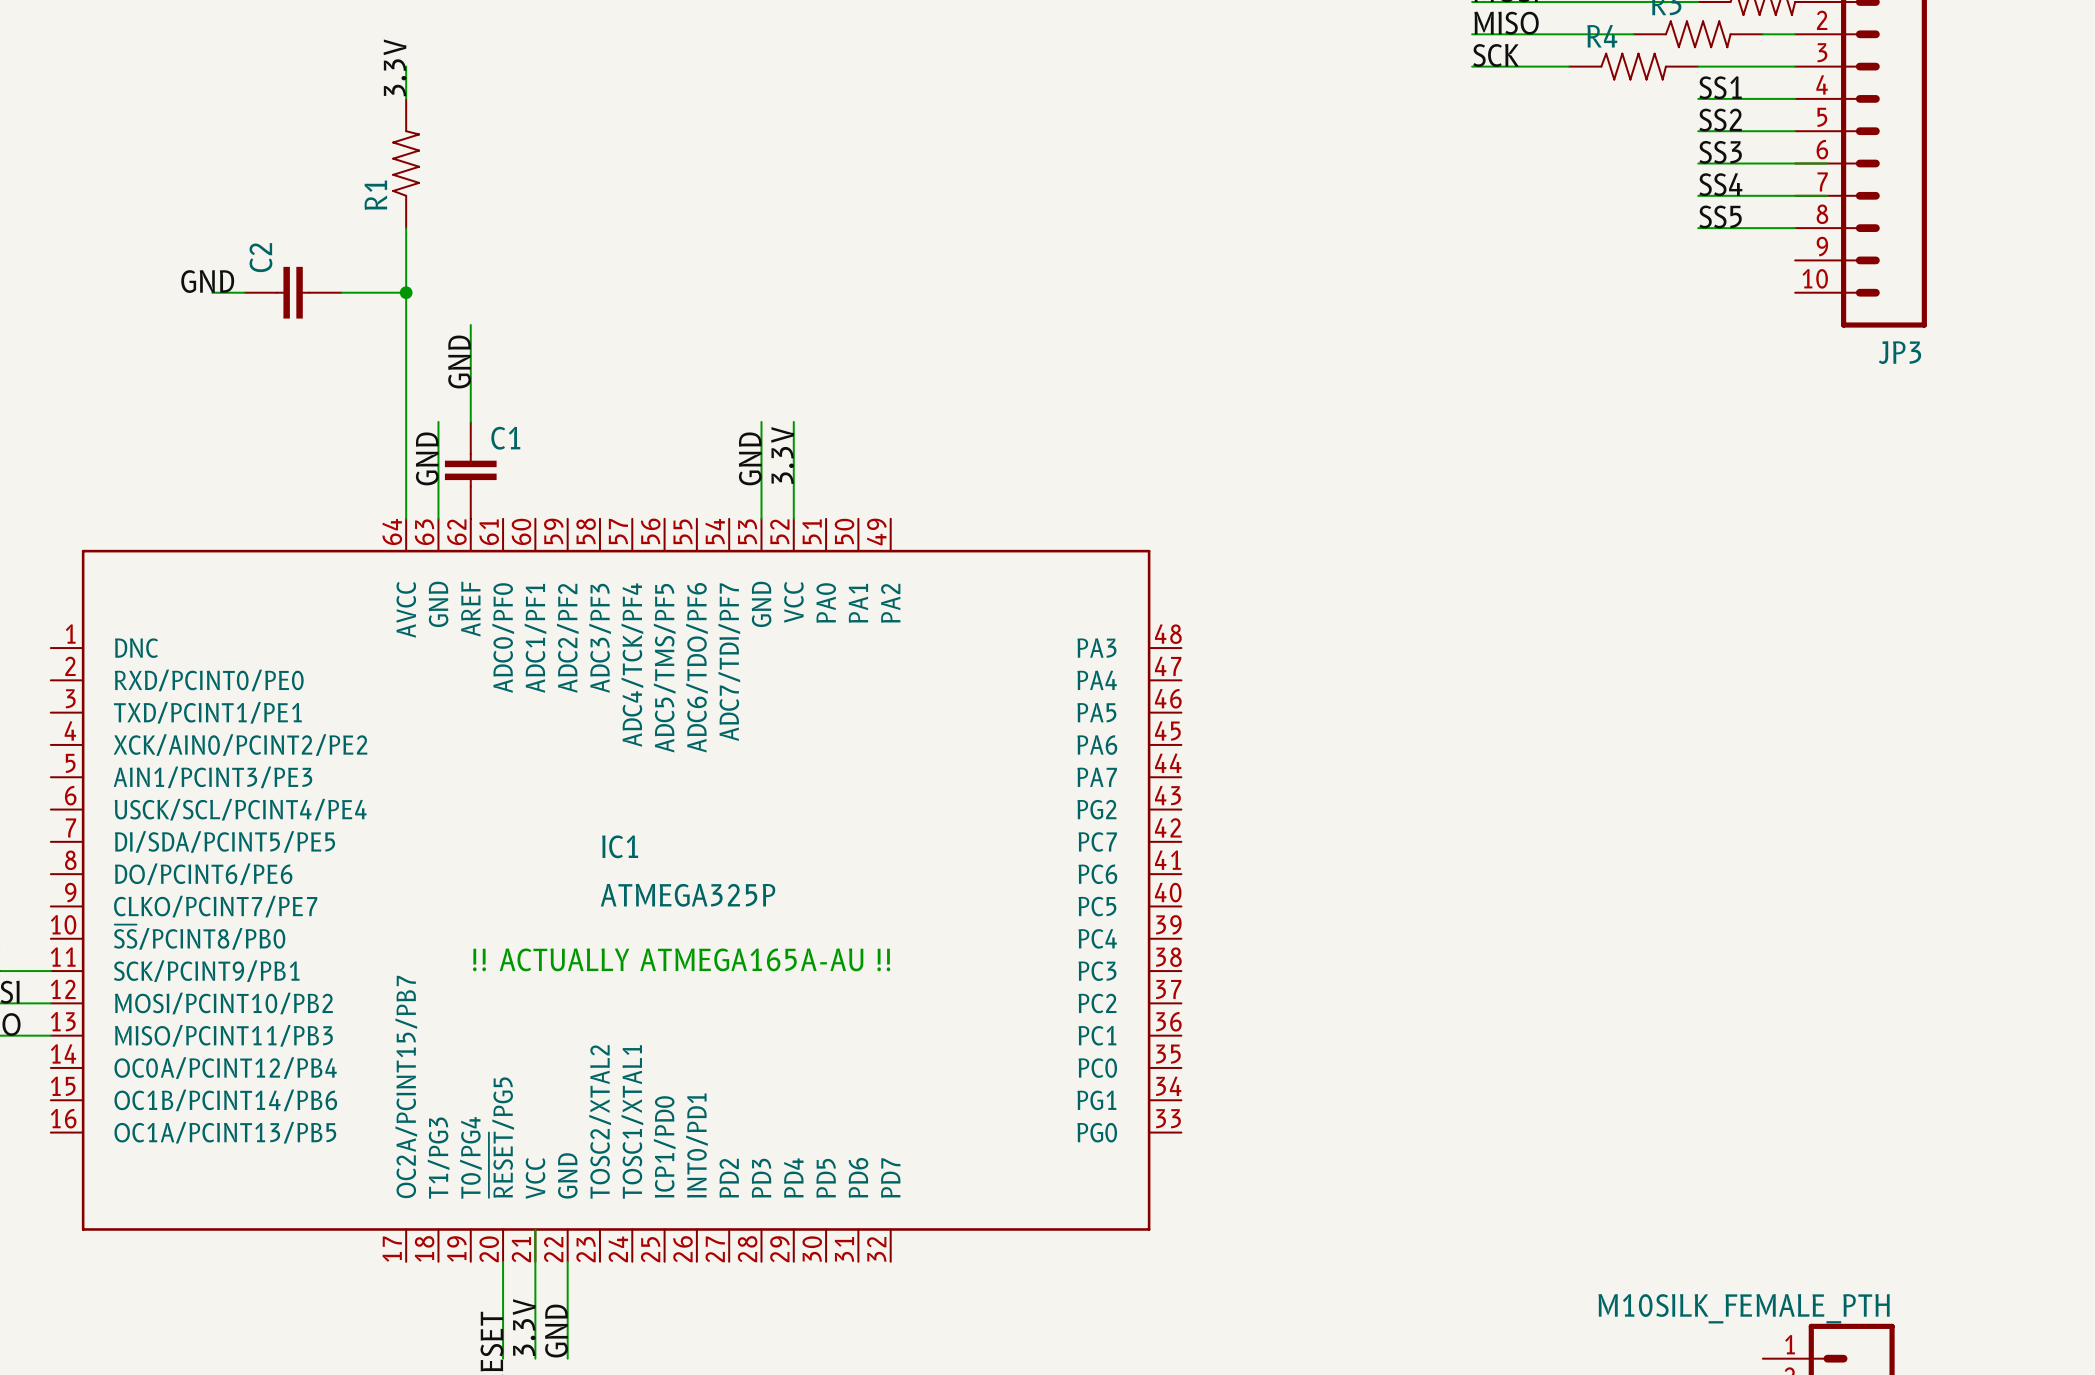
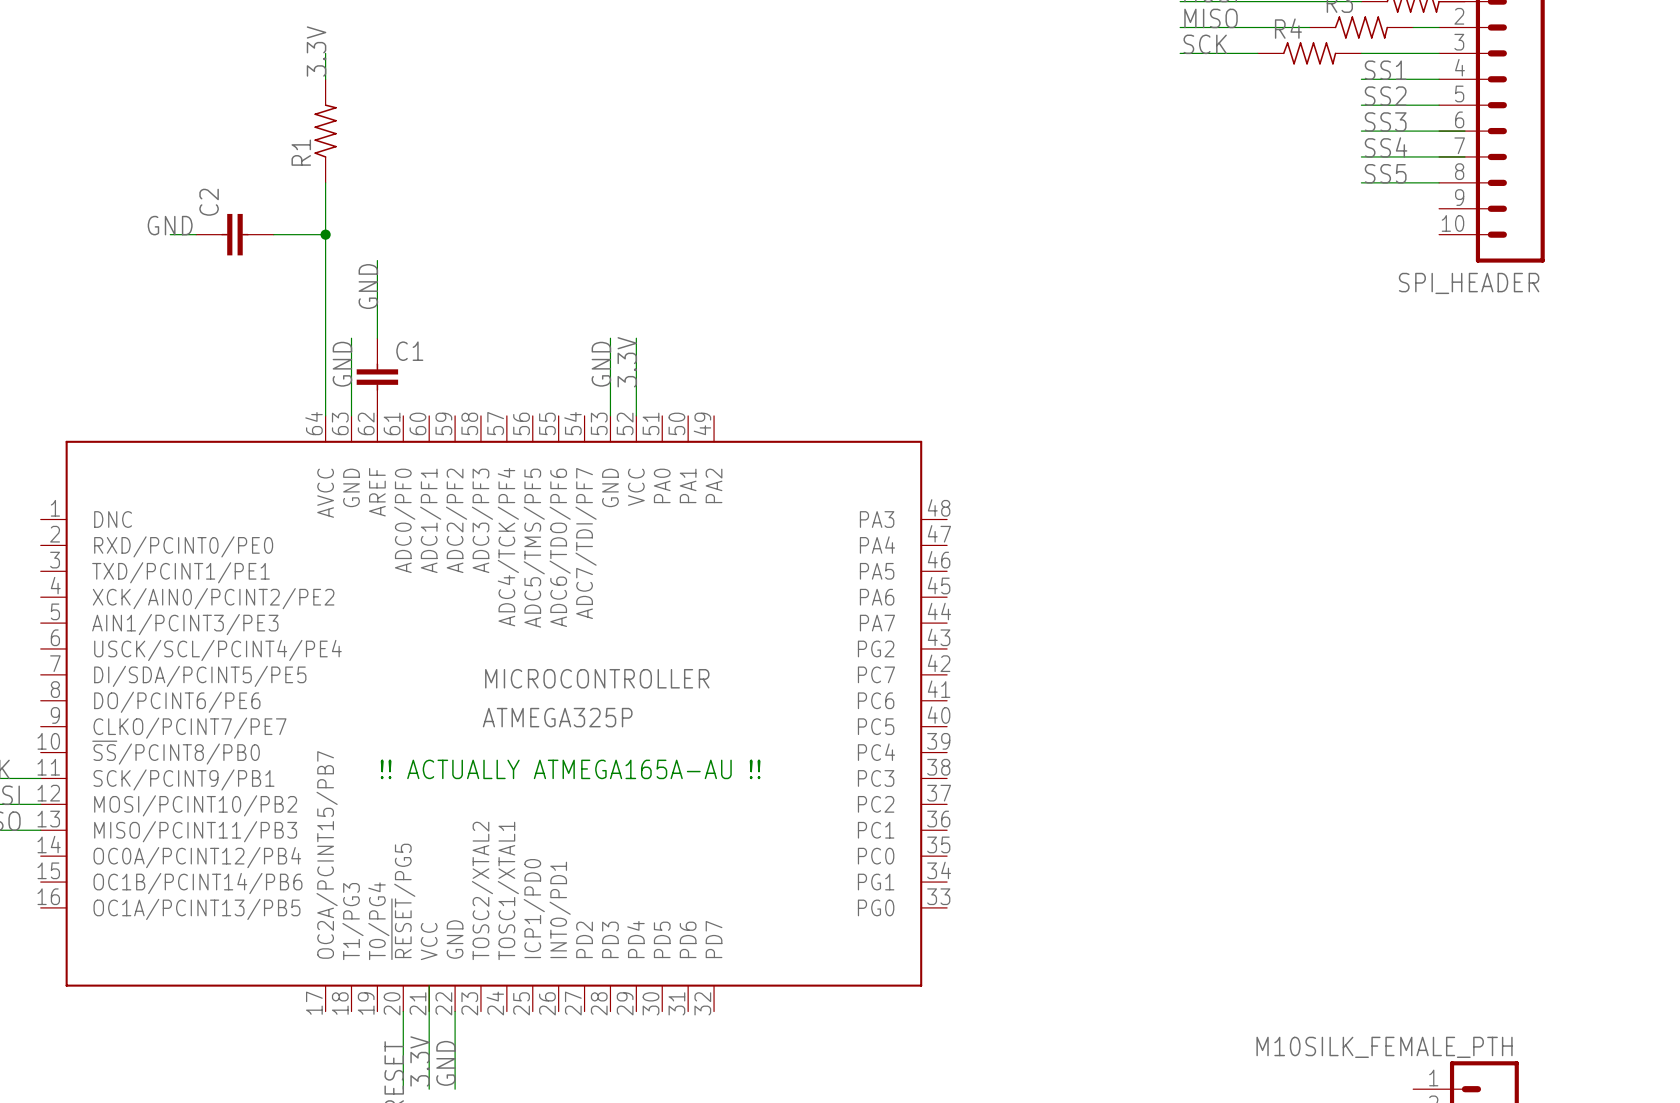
JP3 name: JP3 (1899, 352) -> SPI_HEADER (1469, 283)
IC1 name: IC1 (620, 846) -> MICROCONTROLLER (597, 678)

